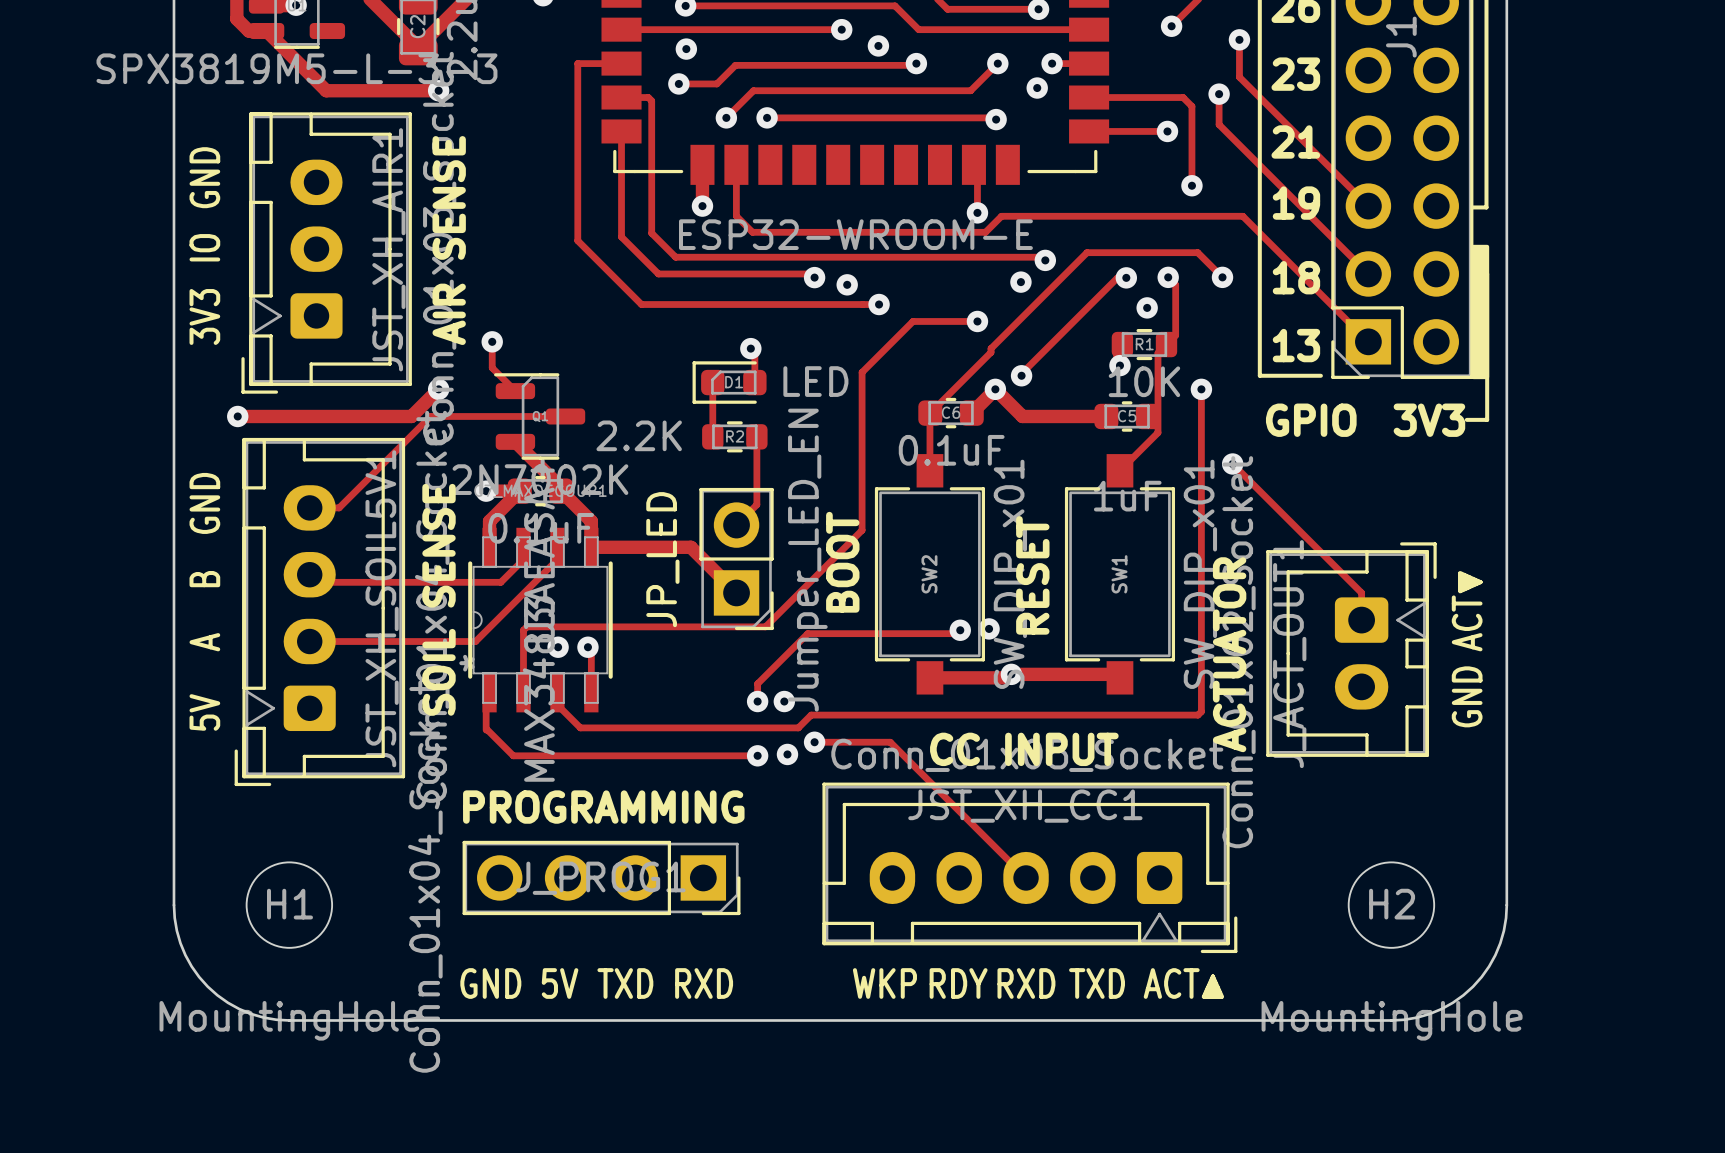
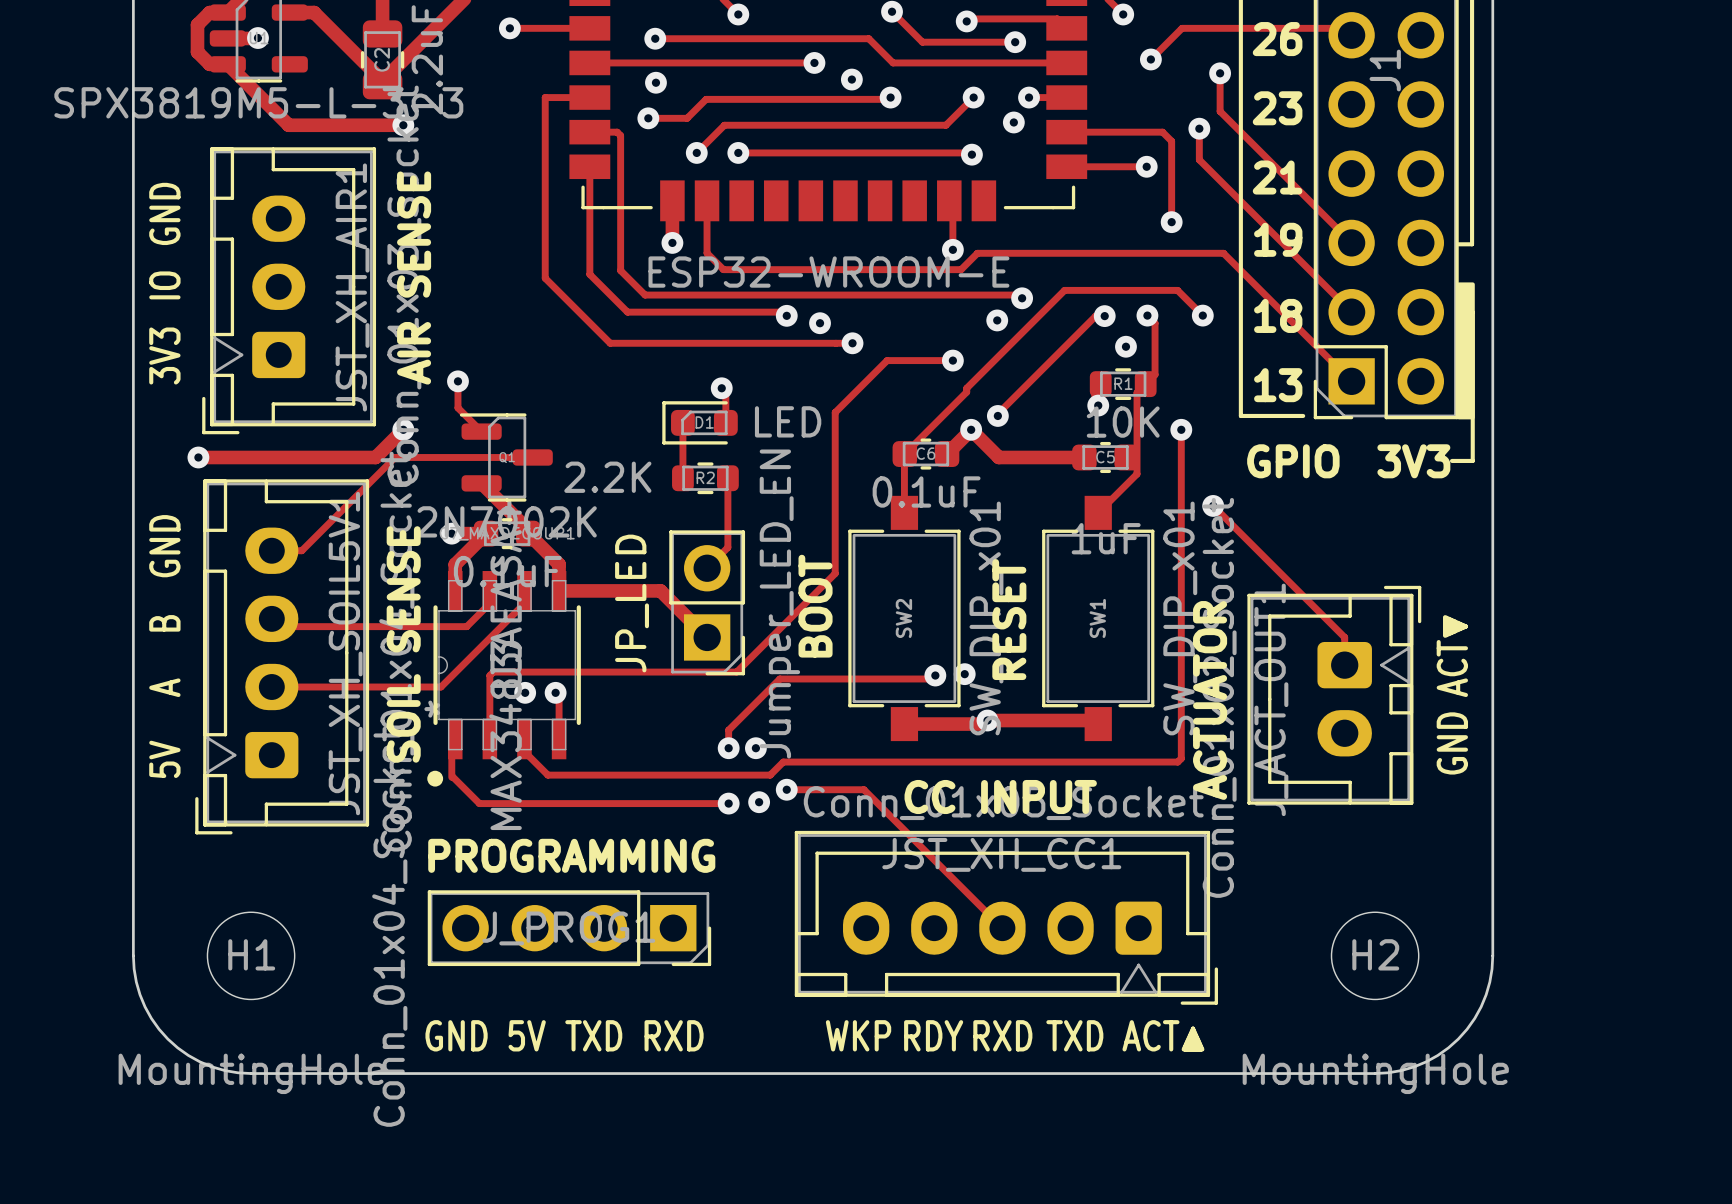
drawing: none -> [427, 770, 444, 787]

